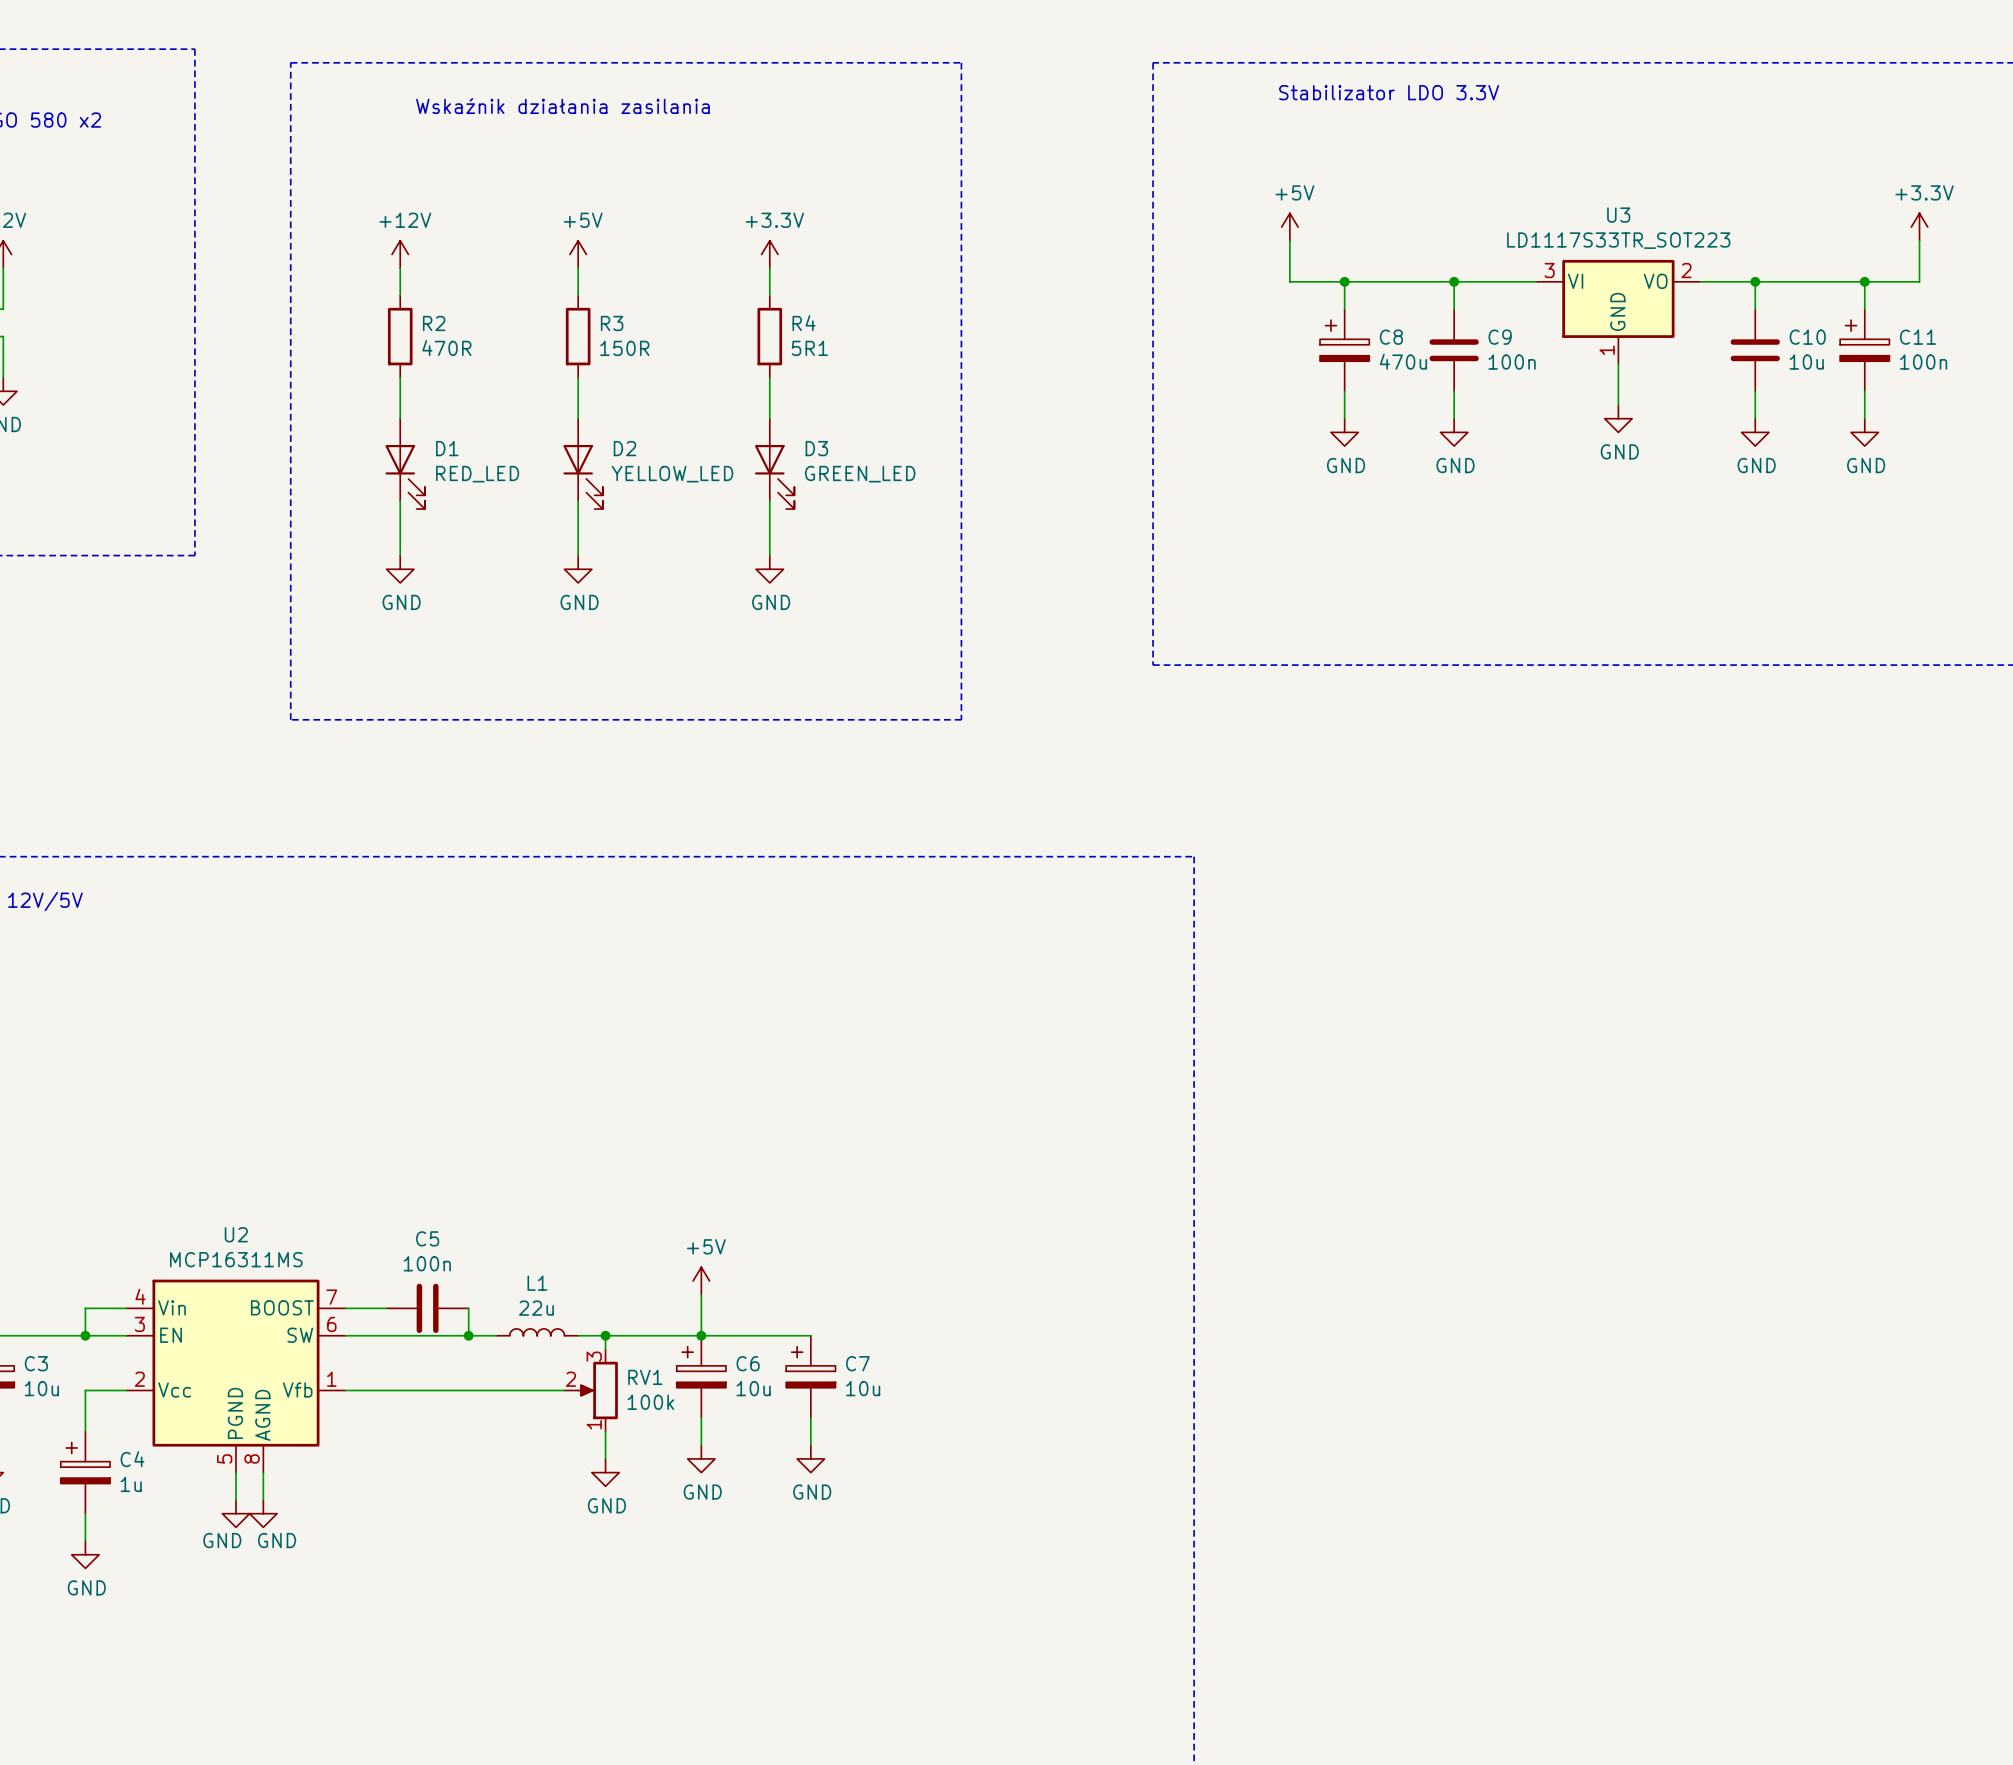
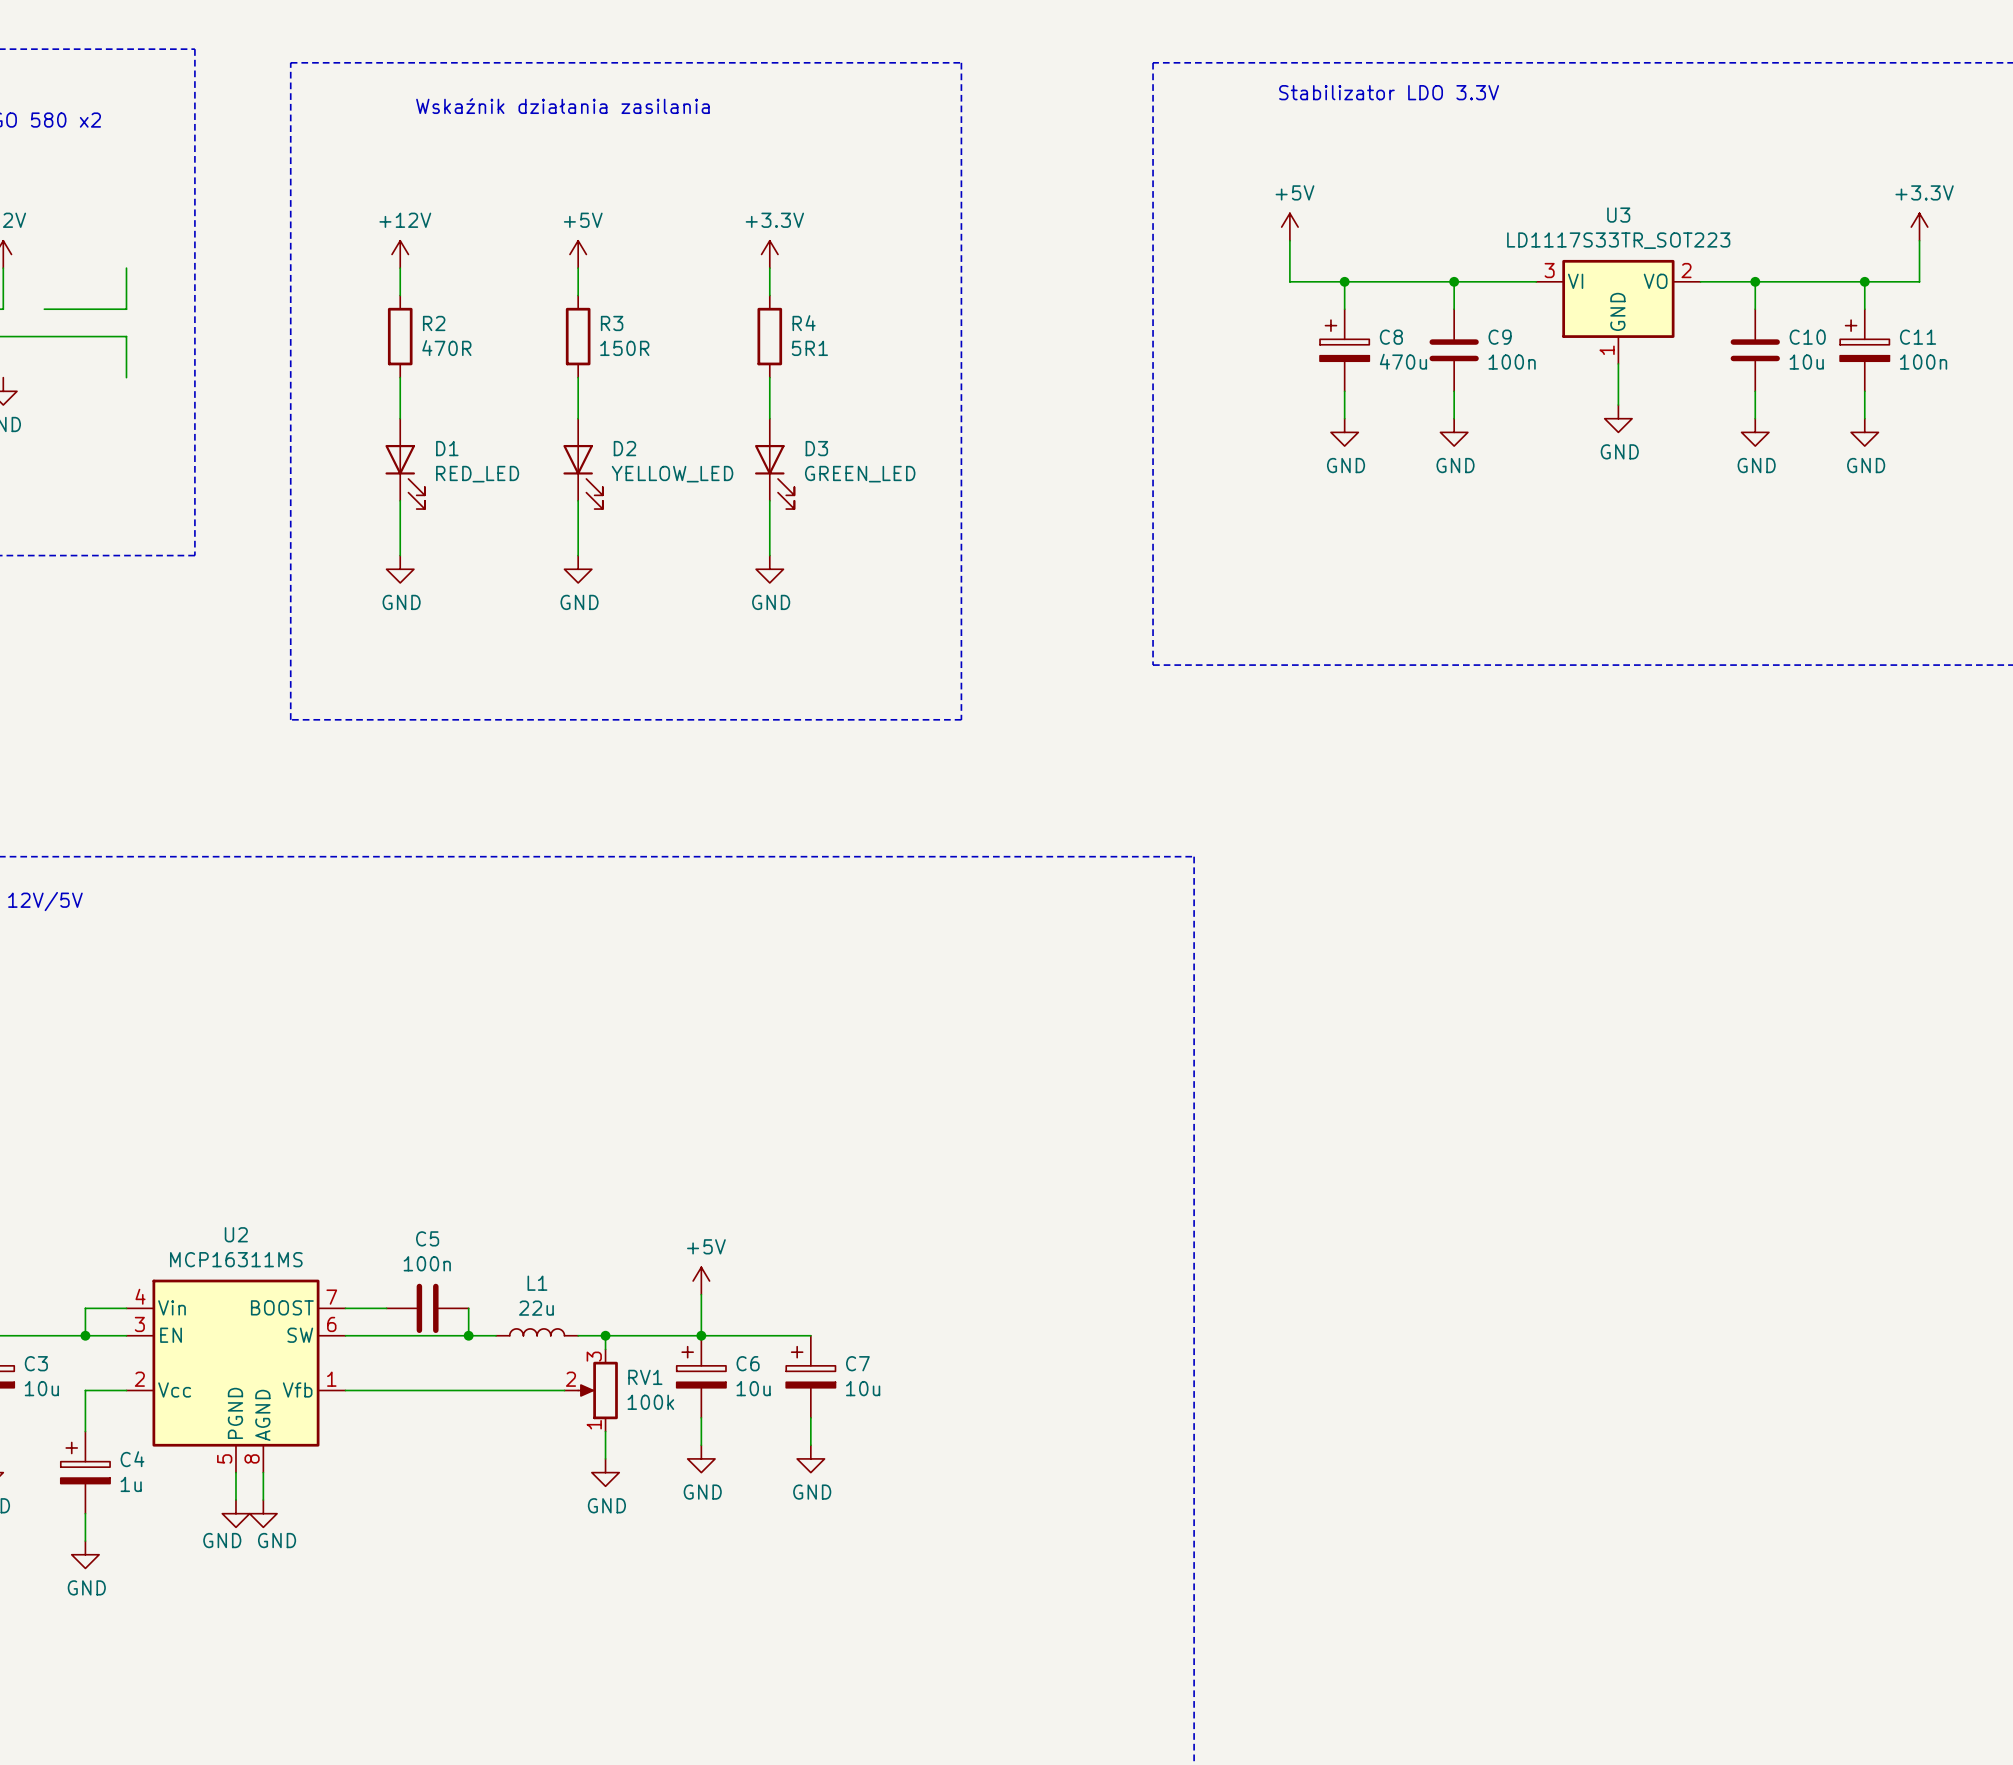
wire: none -> (126, 268) (126, 309) (44, 309)
wire: (3, 336) (3, 377) -> (3, 336) (126, 336) (126, 377)

